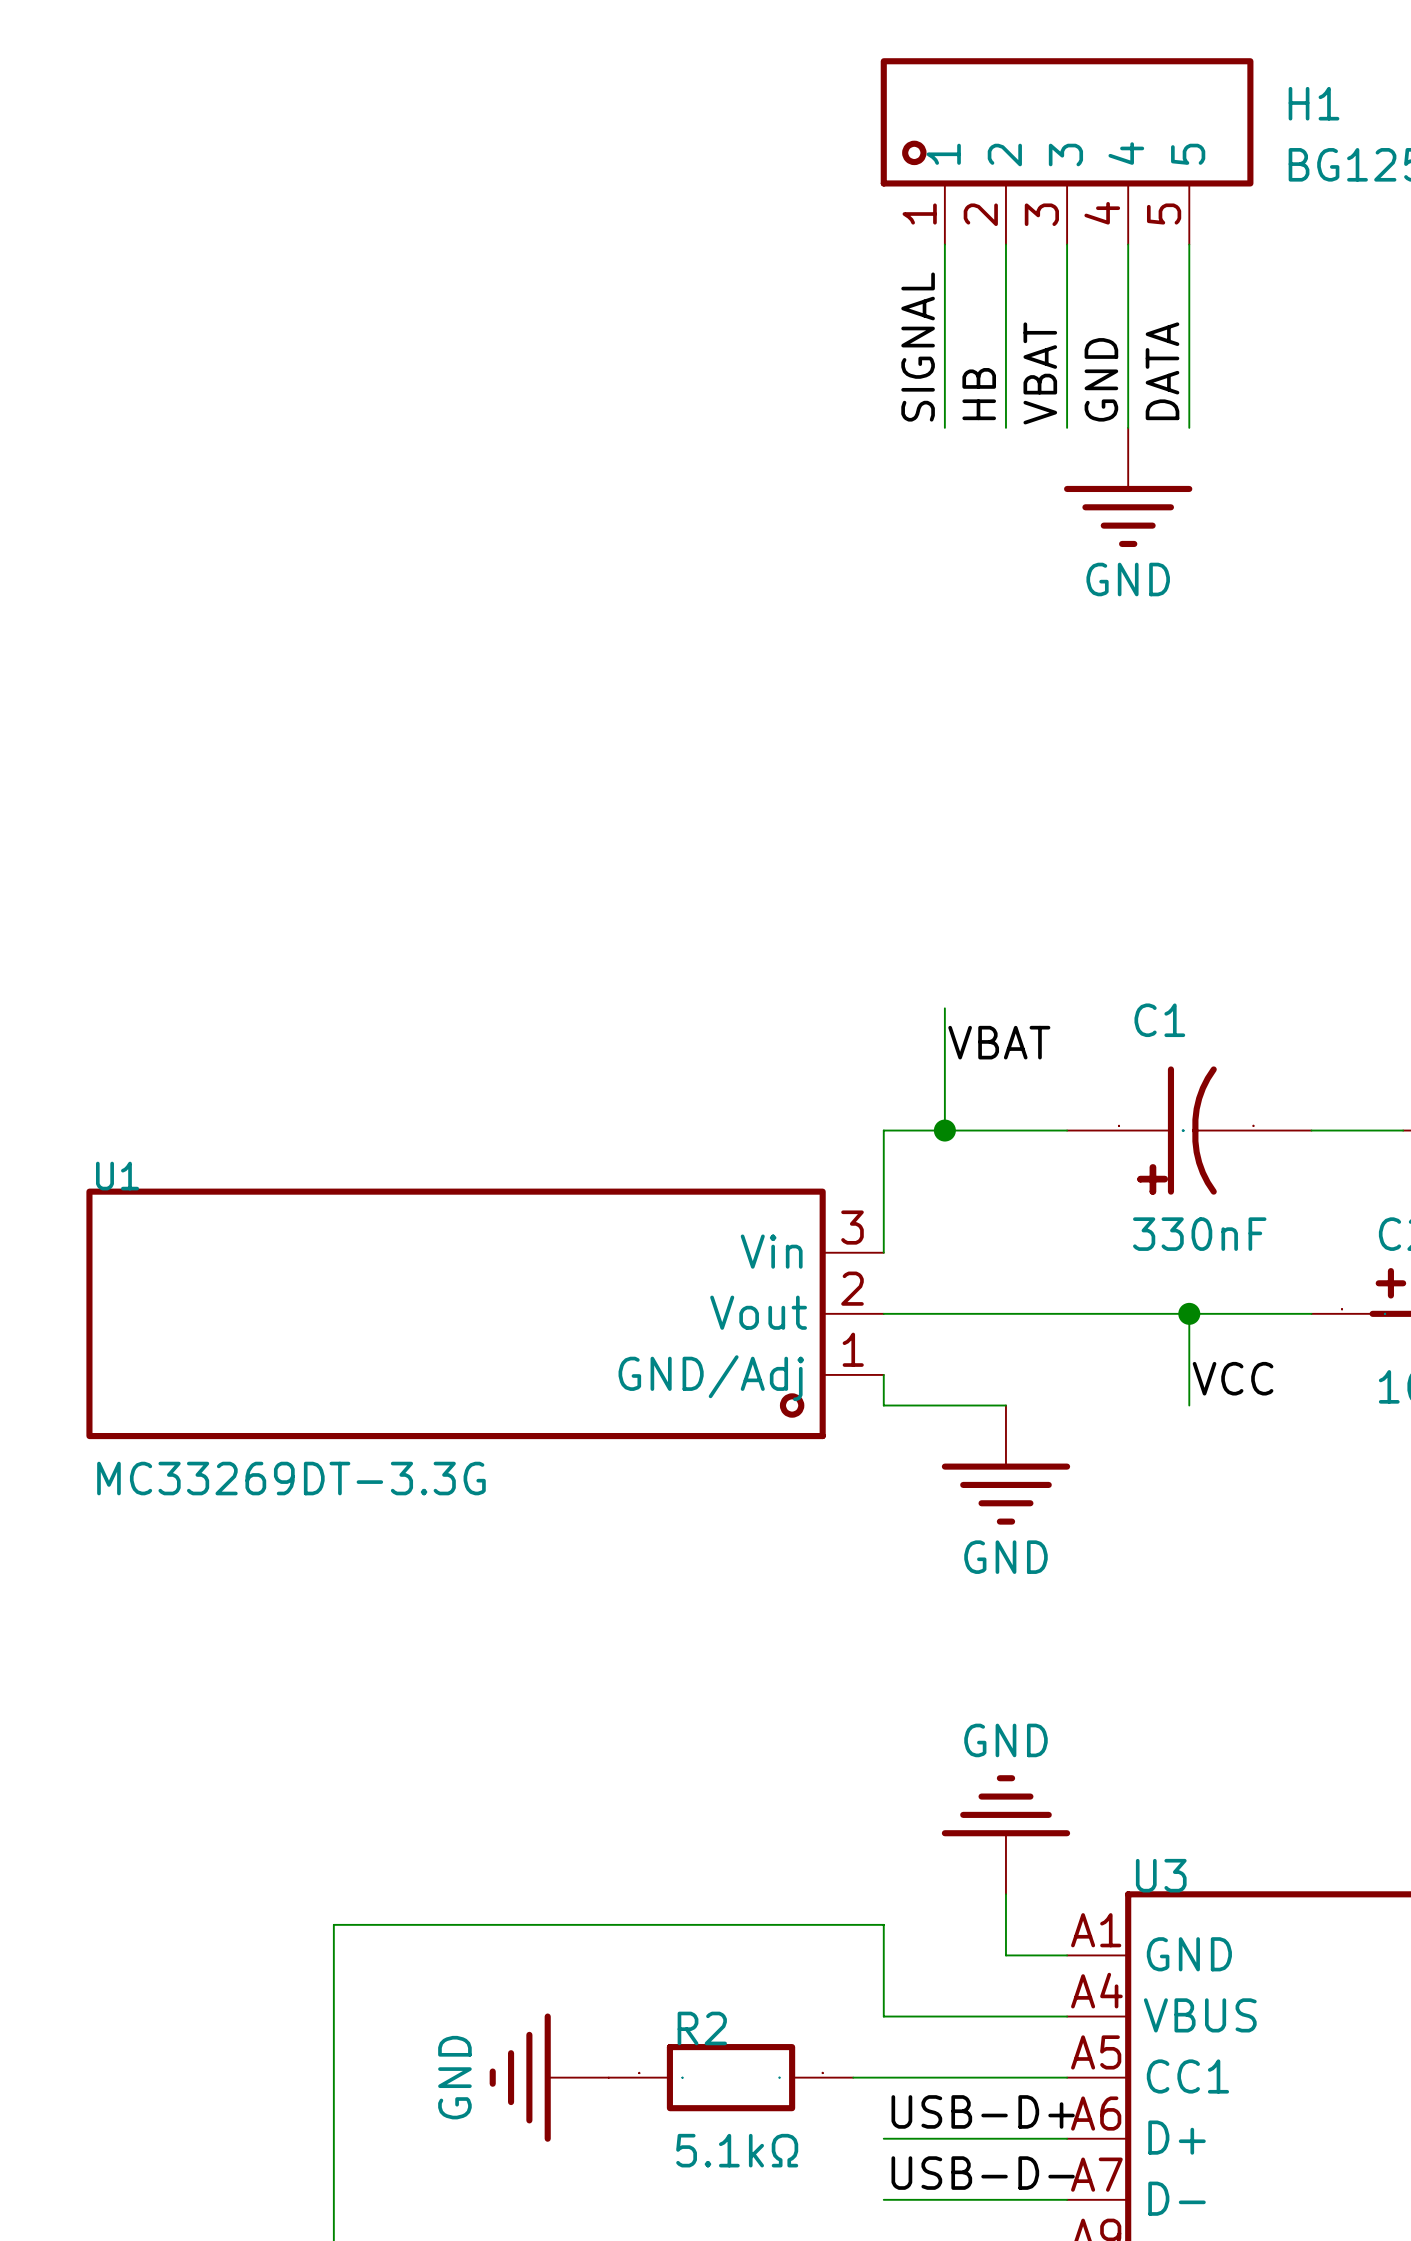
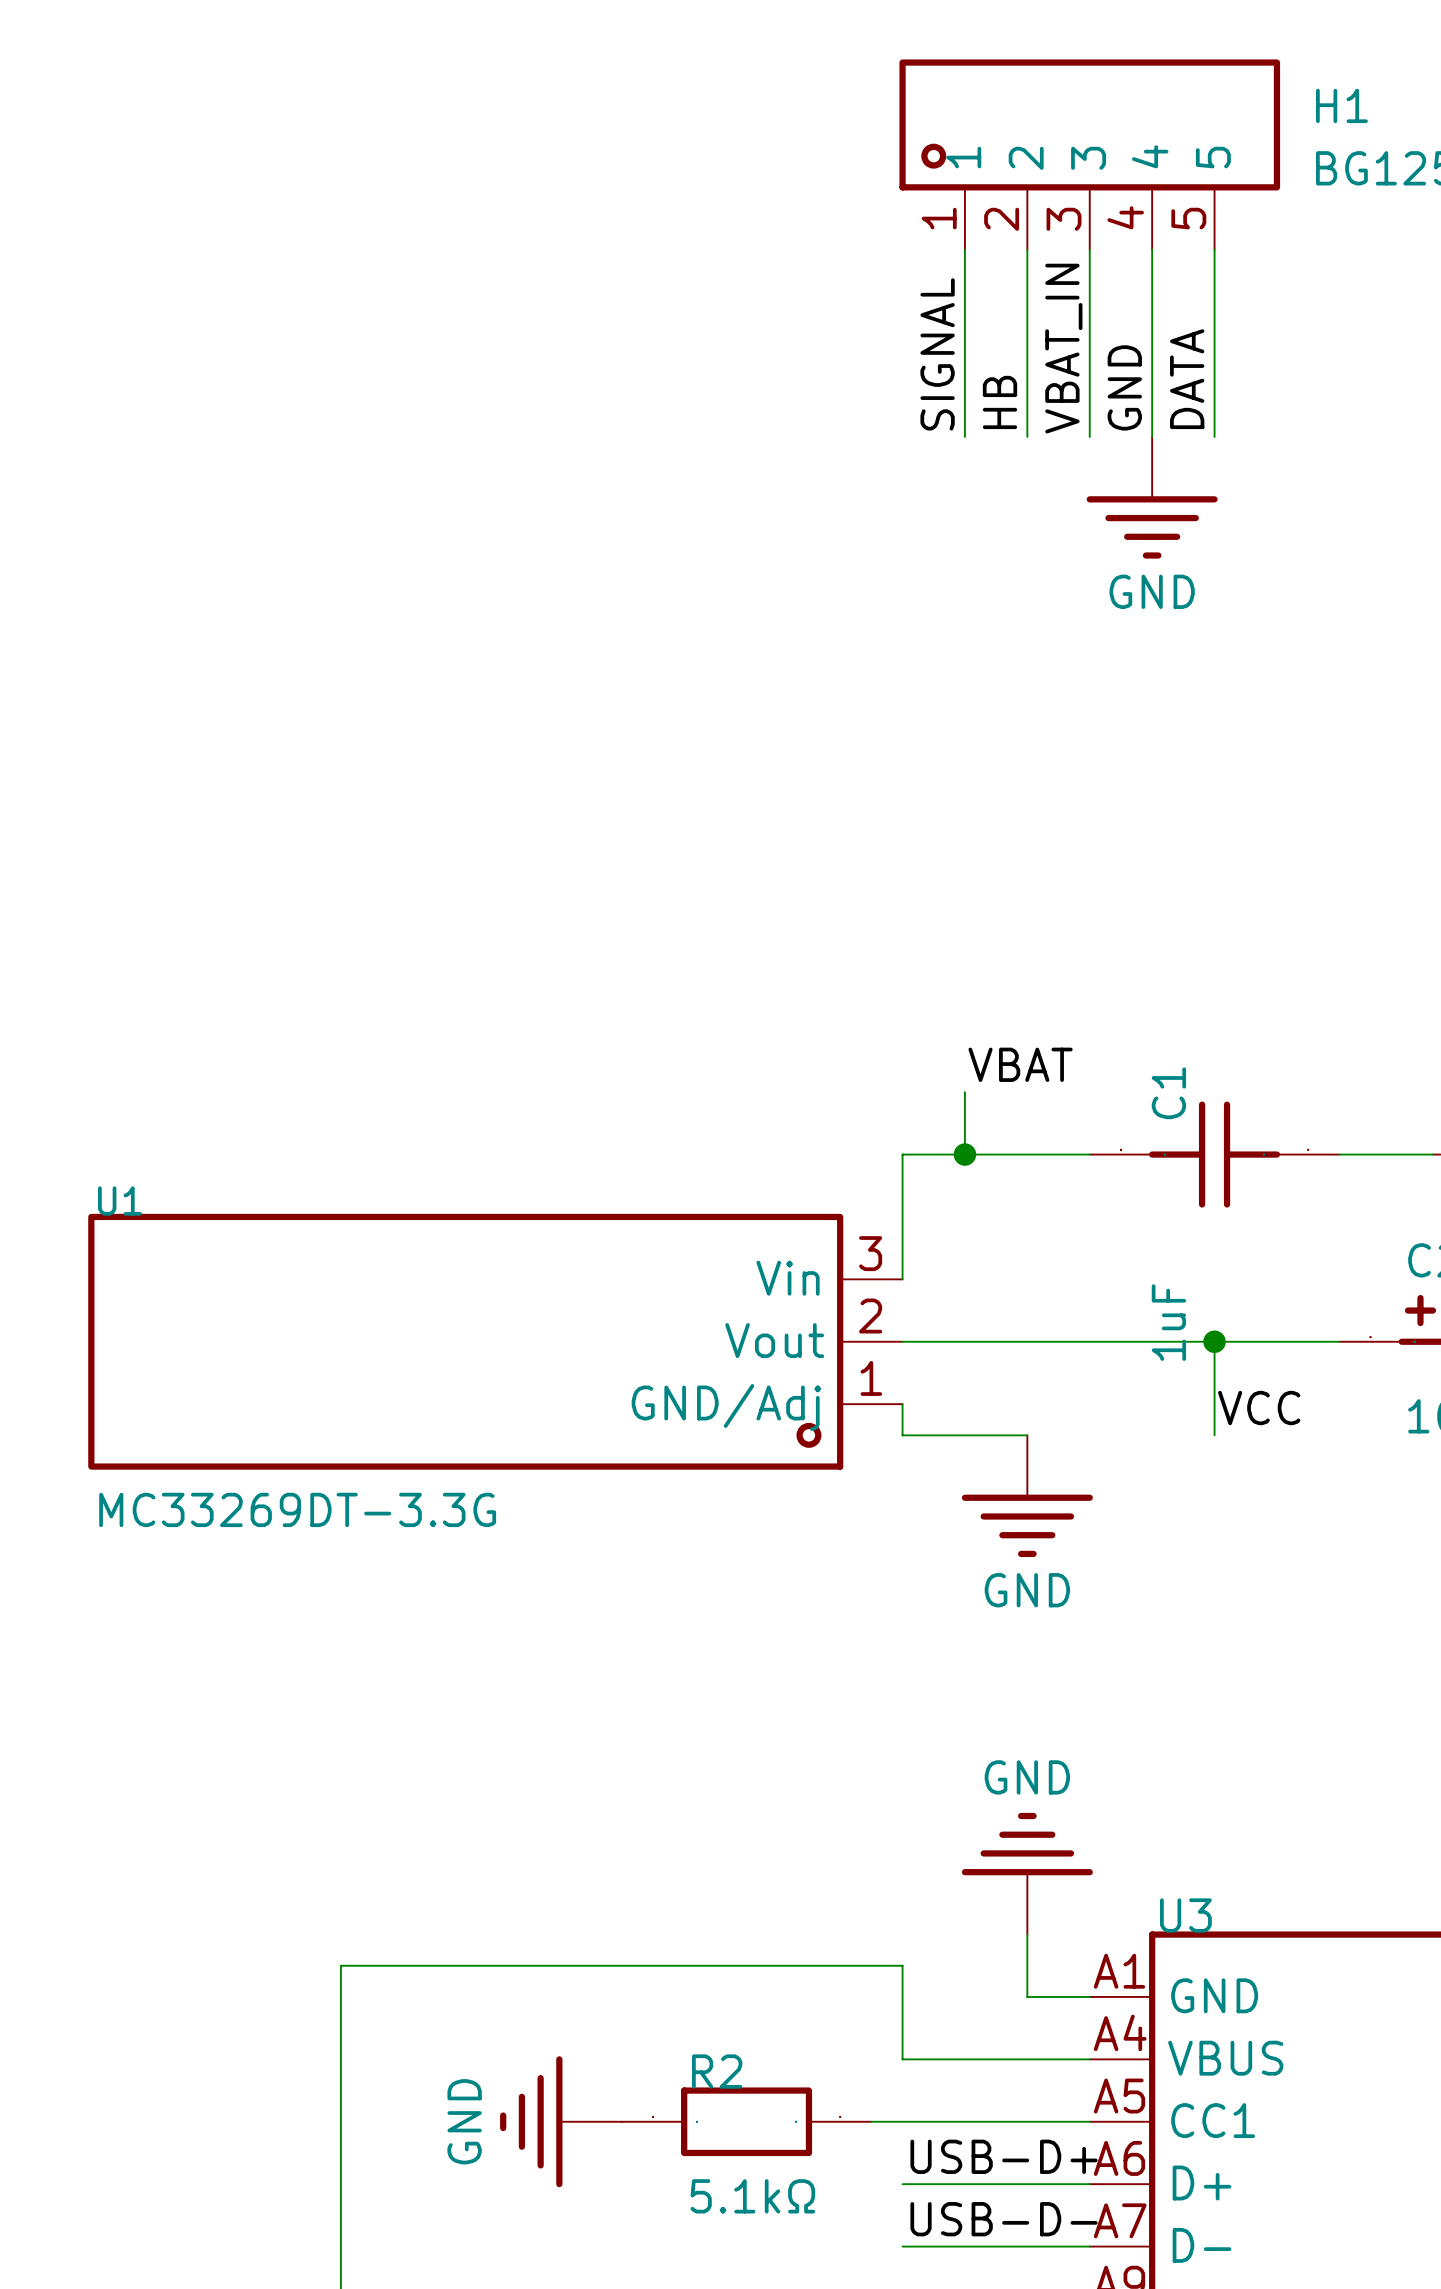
label: VBAT (1040, 373) -> VBAT_IN (1063, 348)
wire: (944, 1008) (944, 1069) -> none
C1 name position: C1 (1159, 1020) -> C1 (1168, 1093)
C1 symbol: [1067, 1066, 1312, 1195] -> [1089, 1101, 1340, 1208]
C1 value: 330nF (1199, 1234) -> 1uF (1168, 1322)

